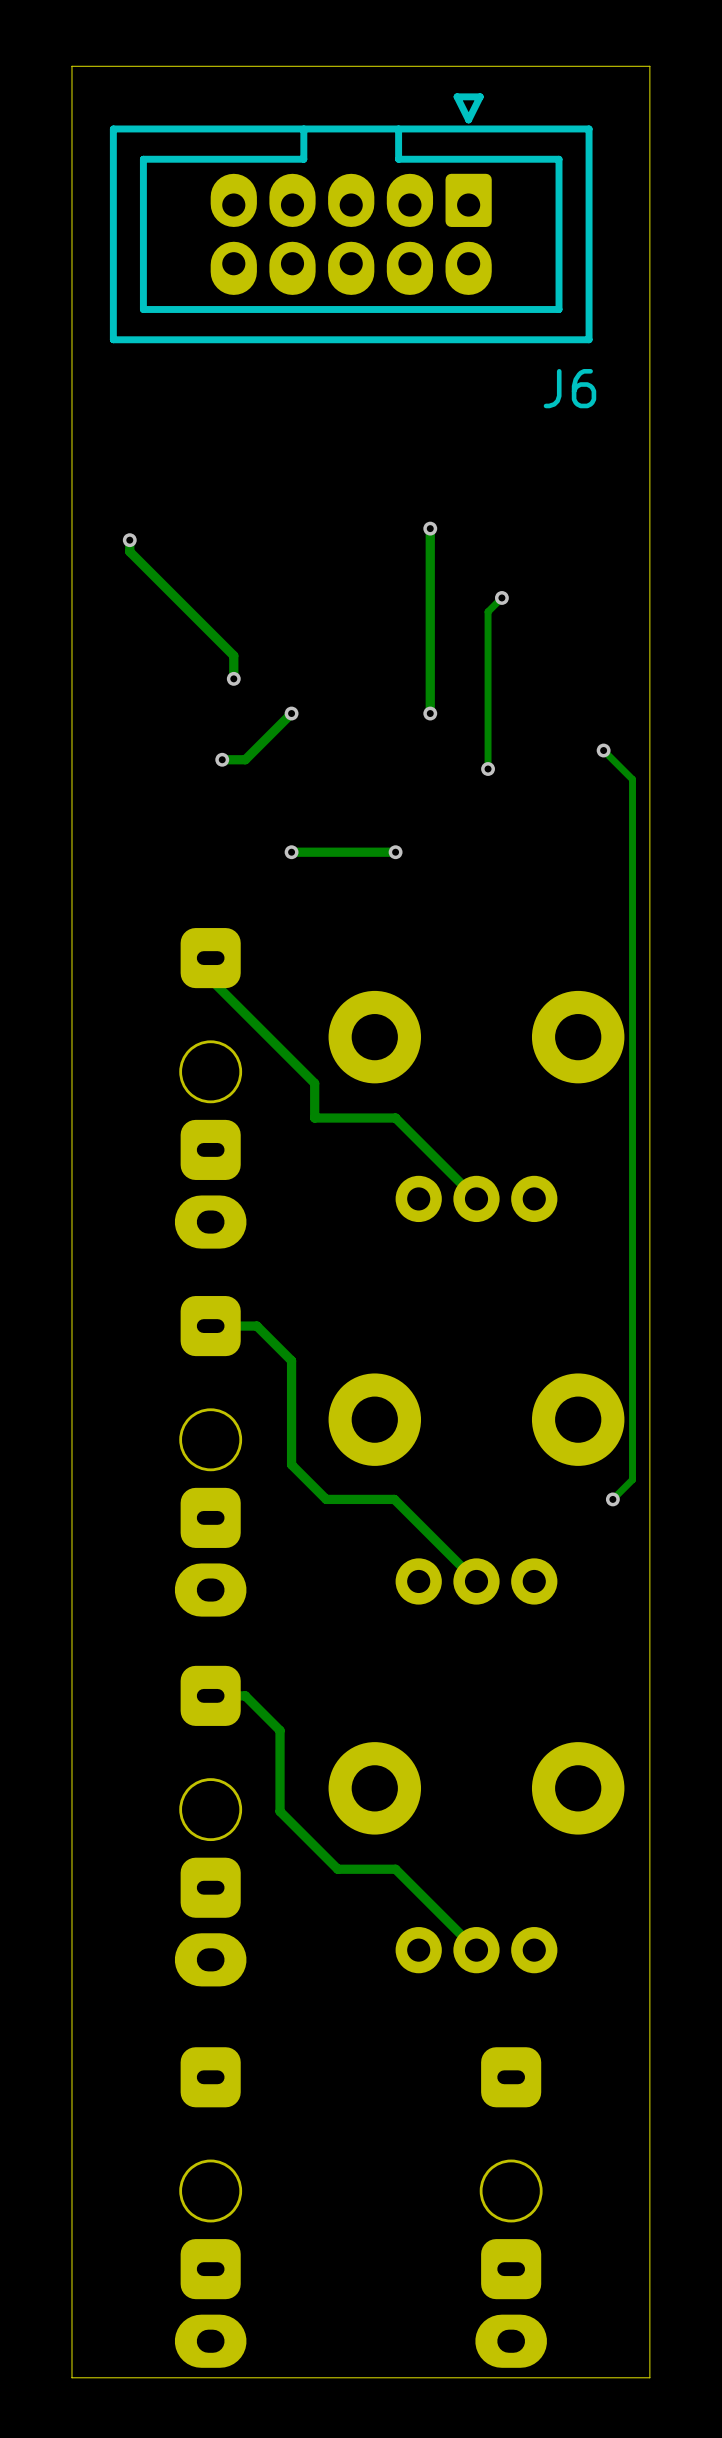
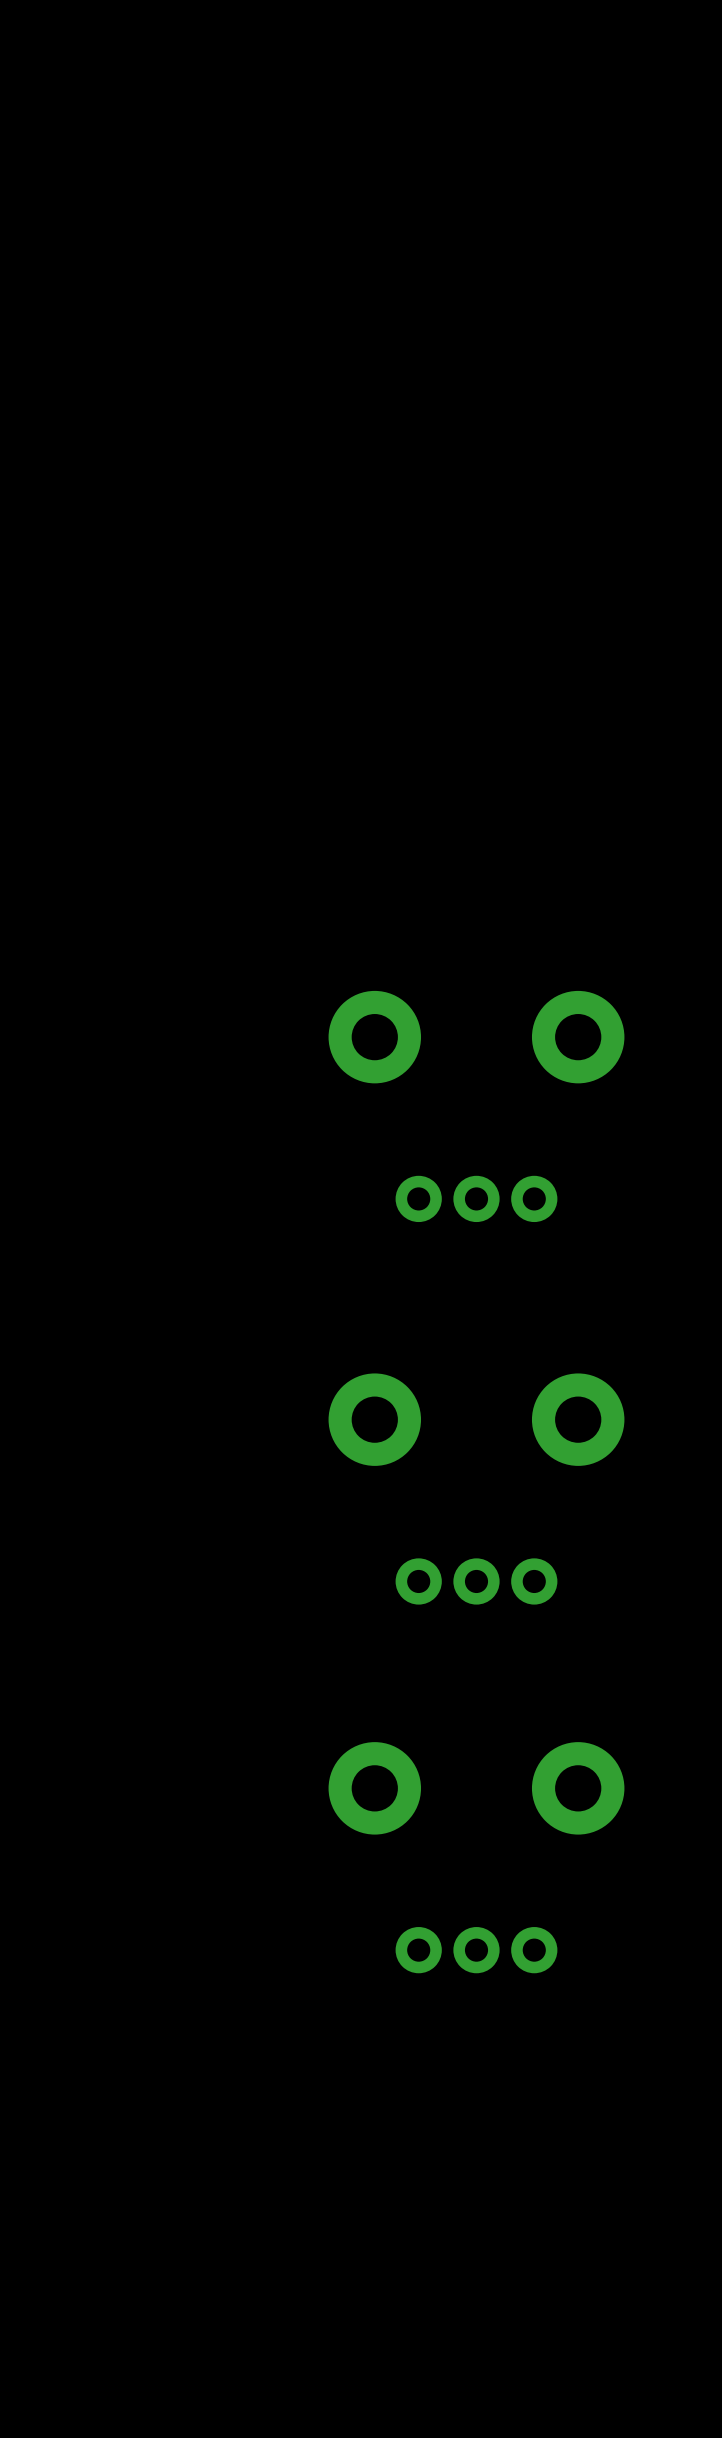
board edge: (649, 66) (71, 66) (71, 2377) (649, 2377) (649, 66) -> none
J6: (351, 218) -> none
track: (430, 528) (430, 713) -> none
via: (430, 528) -> none
track: (129, 540) (129, 551) (233, 655) (233, 678) -> none
via: (129, 540) -> none
track: (501, 597) (488, 611) (488, 769) -> none
via: (501, 597) -> none
via: (233, 678) -> none
track: (291, 713) (245, 759) (222, 759) -> none
via: (291, 713) -> none
via: (430, 713) -> none
track: (603, 750) (632, 779) (632, 1479) (612, 1499) -> none
via: (603, 750) -> none
via: (222, 759) -> none
via: (488, 769) -> none
via: (291, 852) -> none
track: (395, 852) (291, 852) -> none
via: (395, 852) -> none
track: (210, 958) (210, 979) (314, 1083) (314, 1118) (395, 1118) (476, 1198) -> none
part: (210, 1088) -> none
track: (210, 1326) (256, 1326) (291, 1360) (291, 1464) (326, 1499) (394, 1499) (476, 1581) -> none
part: (210, 1456) -> none
via: (612, 1499) -> none
track: (210, 1695) (245, 1695) (280, 1730) (280, 1811) (337, 1869) (395, 1869) (476, 1950) -> none
part: (210, 1826) -> none
part: (210, 2207) -> none
part: (511, 2207) -> none

